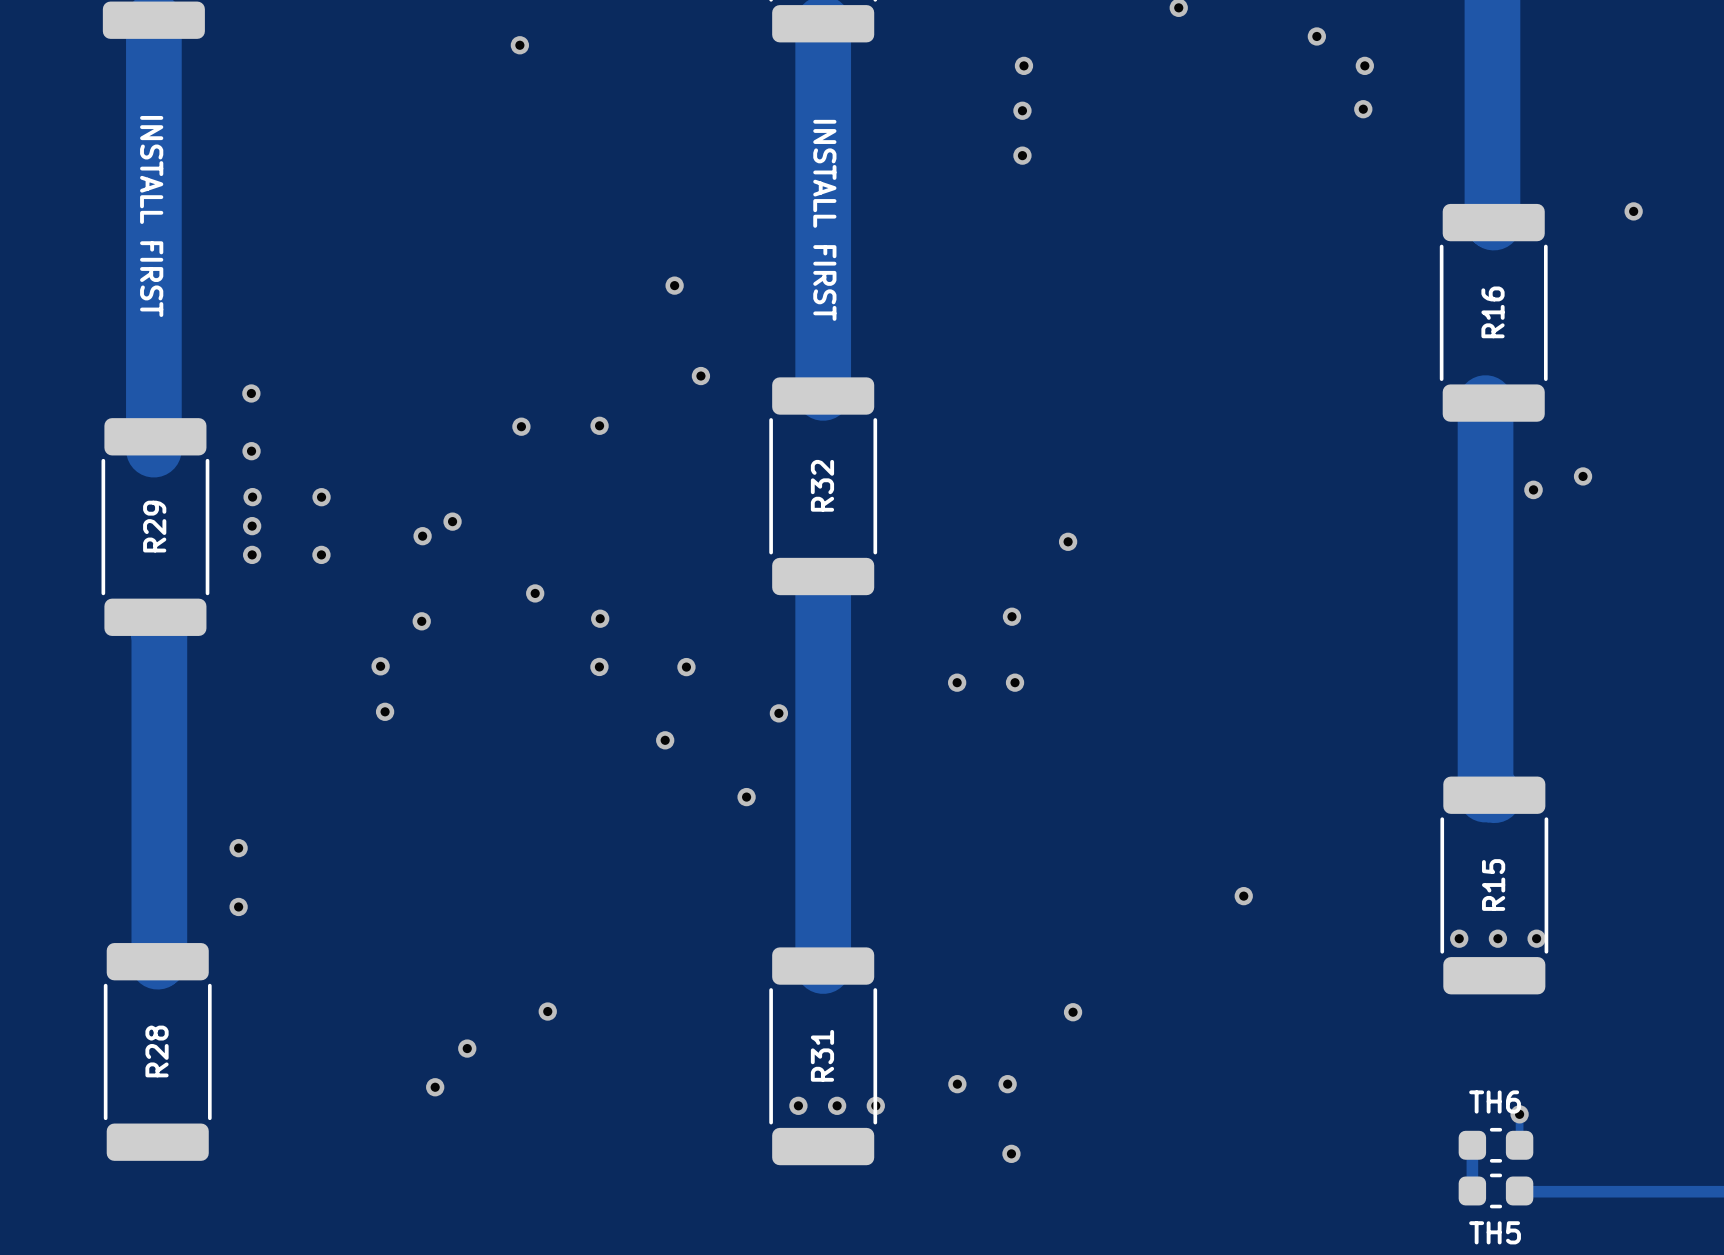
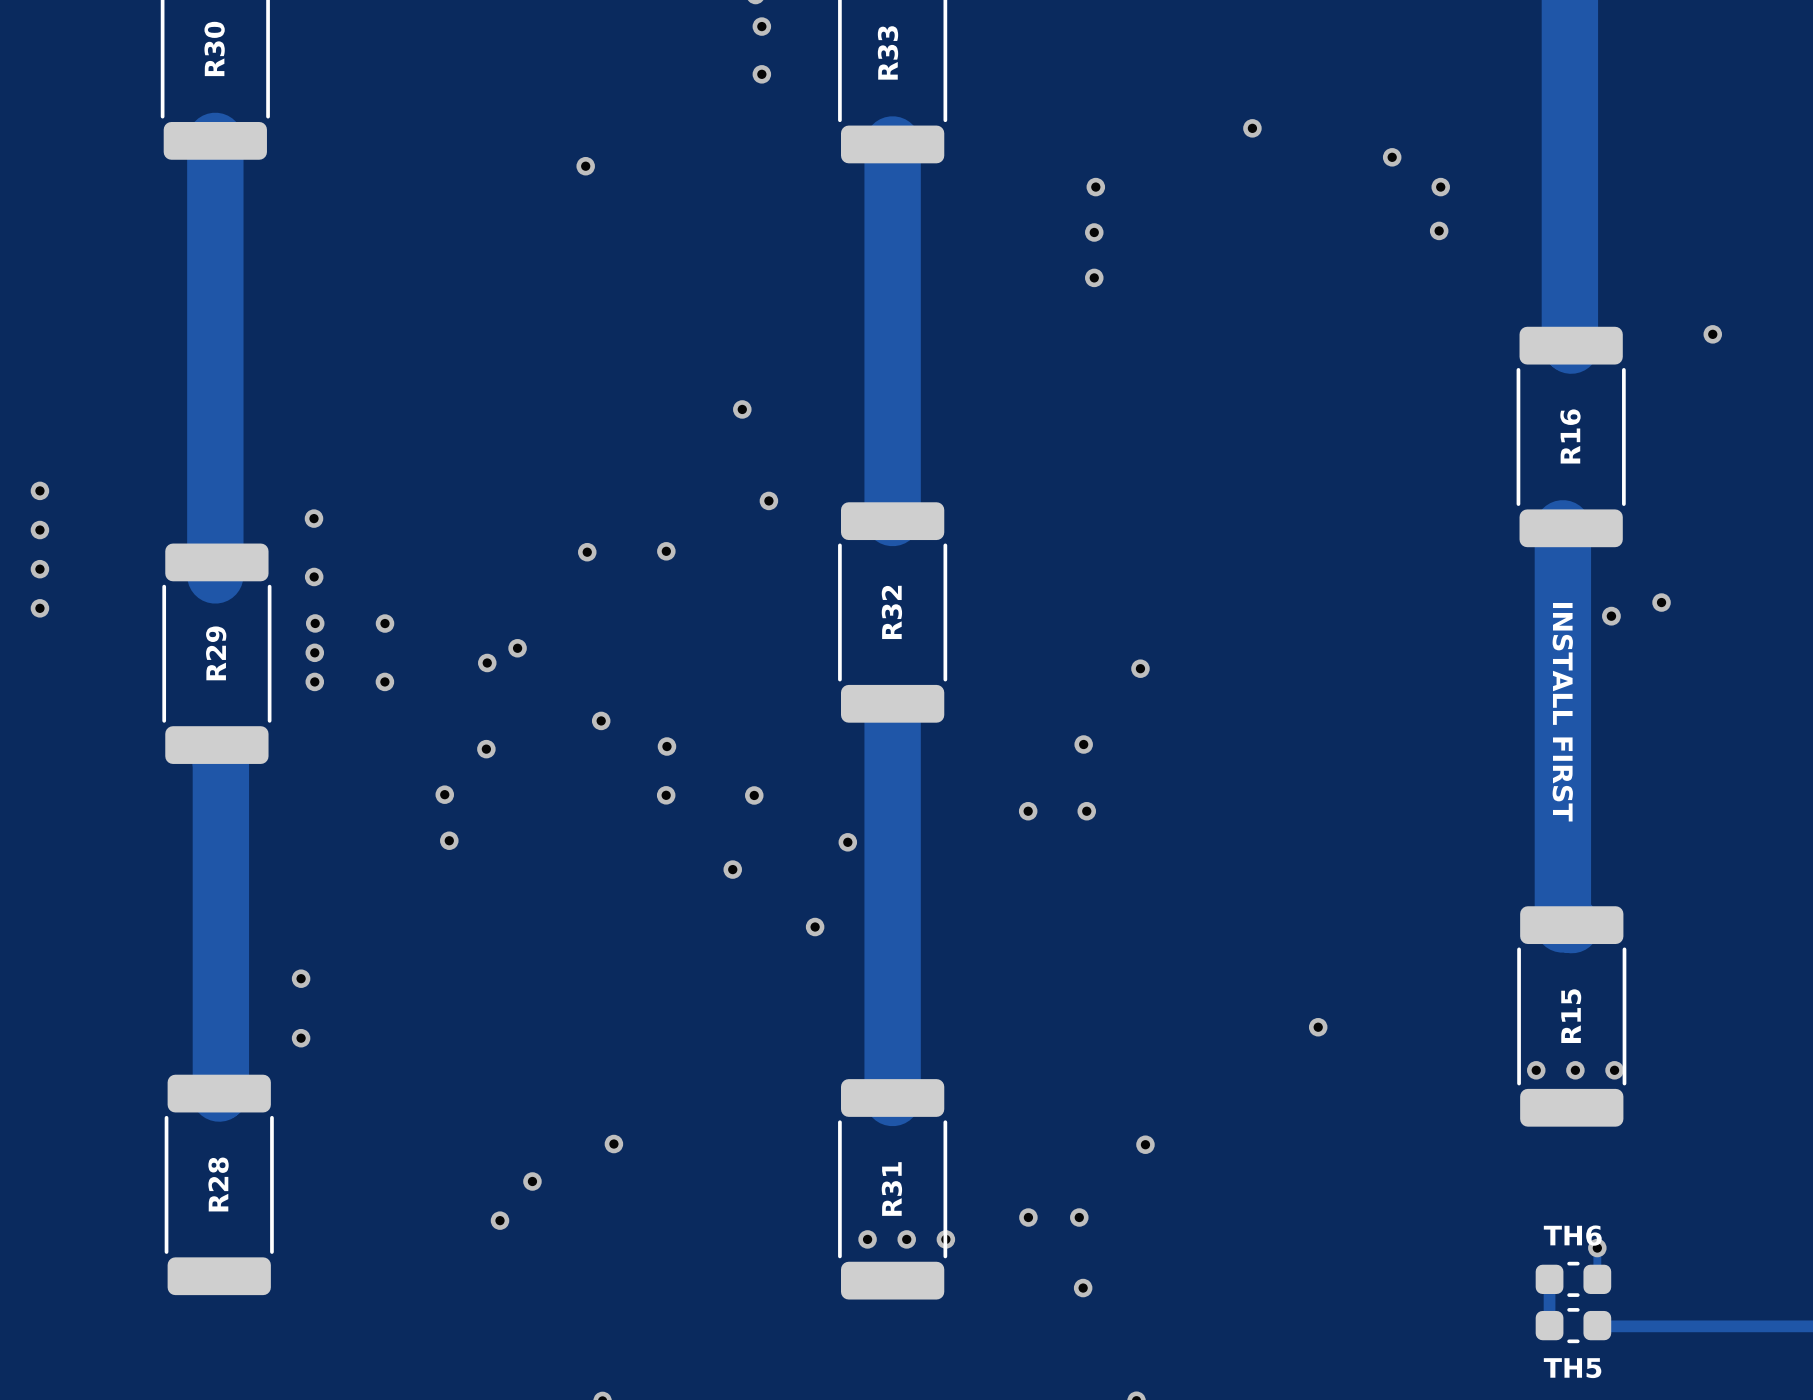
text: INSTALL FIRST (151, 216) -> none
text: INSTALL FIRST (824, 220) -> none
text: none -> INSTALL FIRST (1562, 712)

